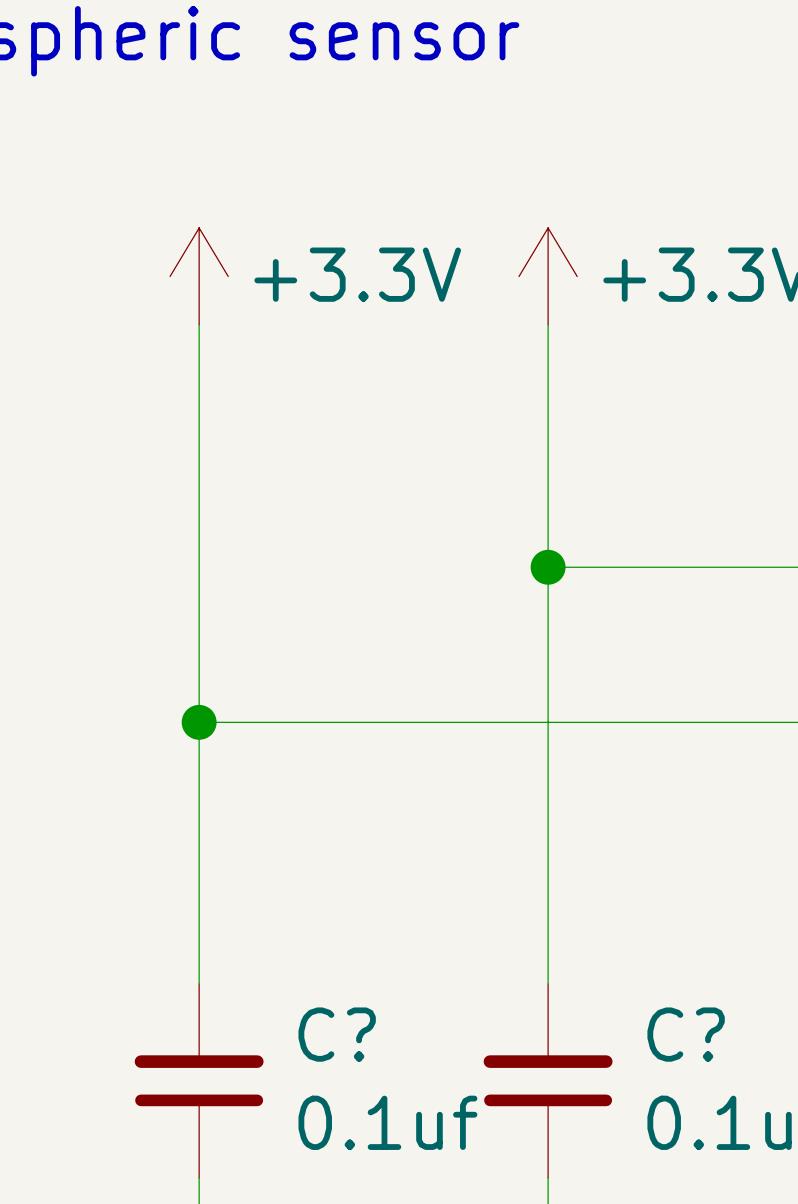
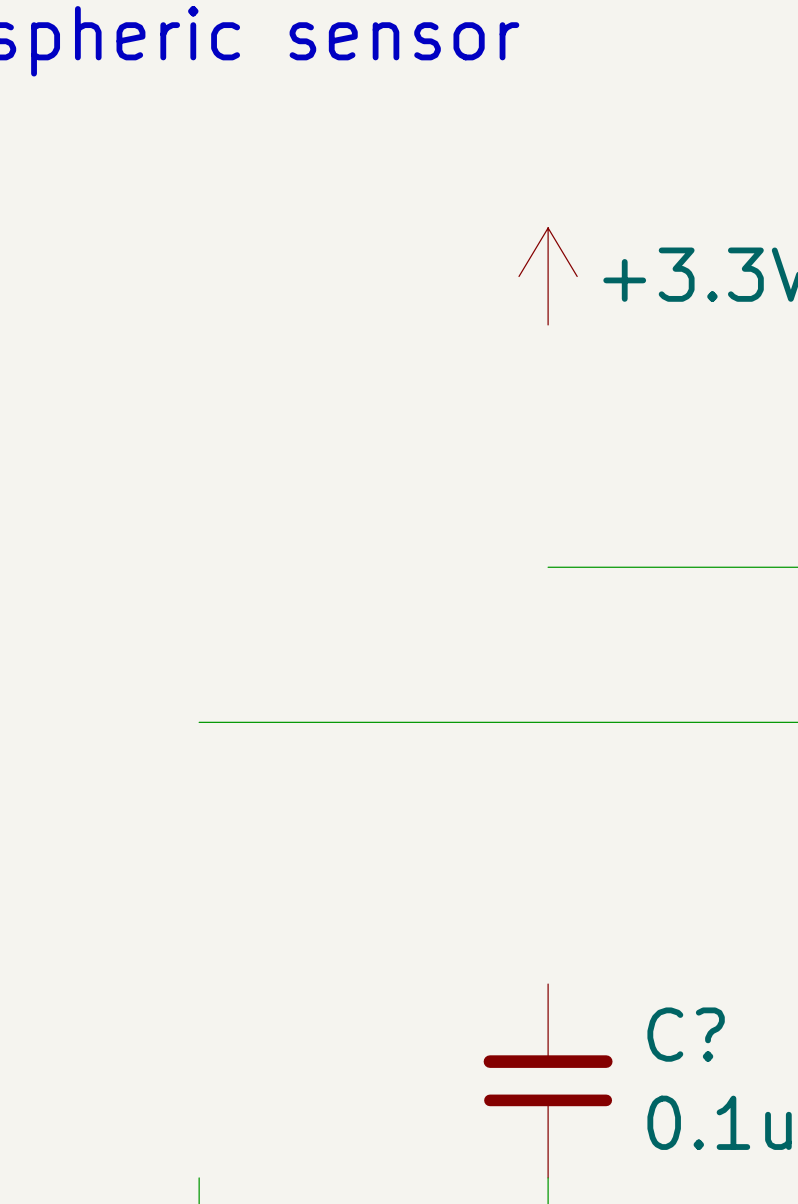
power symbol: +3.3V (199, 276) -> none
wire: (199, 324) (199, 984) -> none
wire: (548, 324) (548, 984) -> none
junction: (548, 567) -> none
junction: (199, 722) -> none
C?: 0.1uf (199, 1080) -> none

